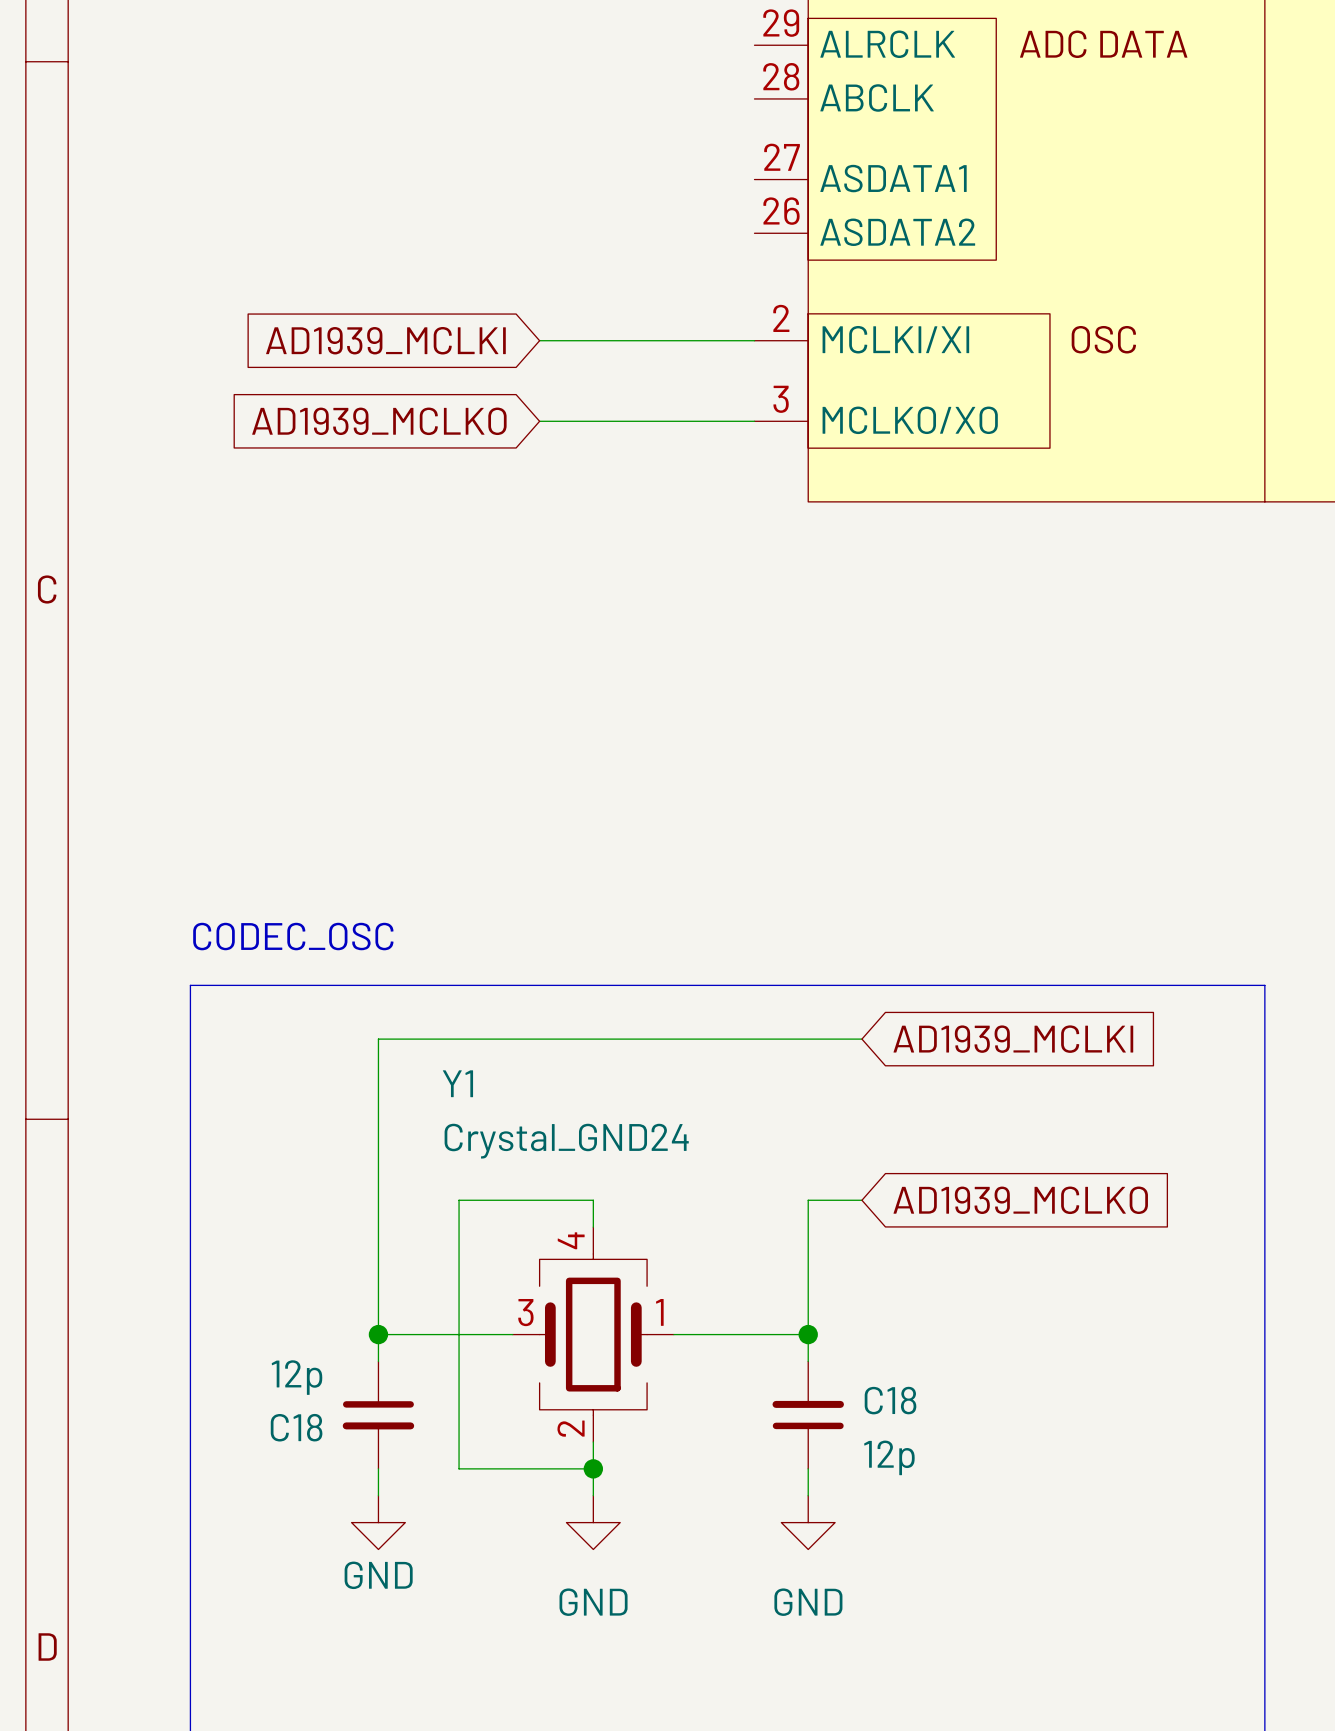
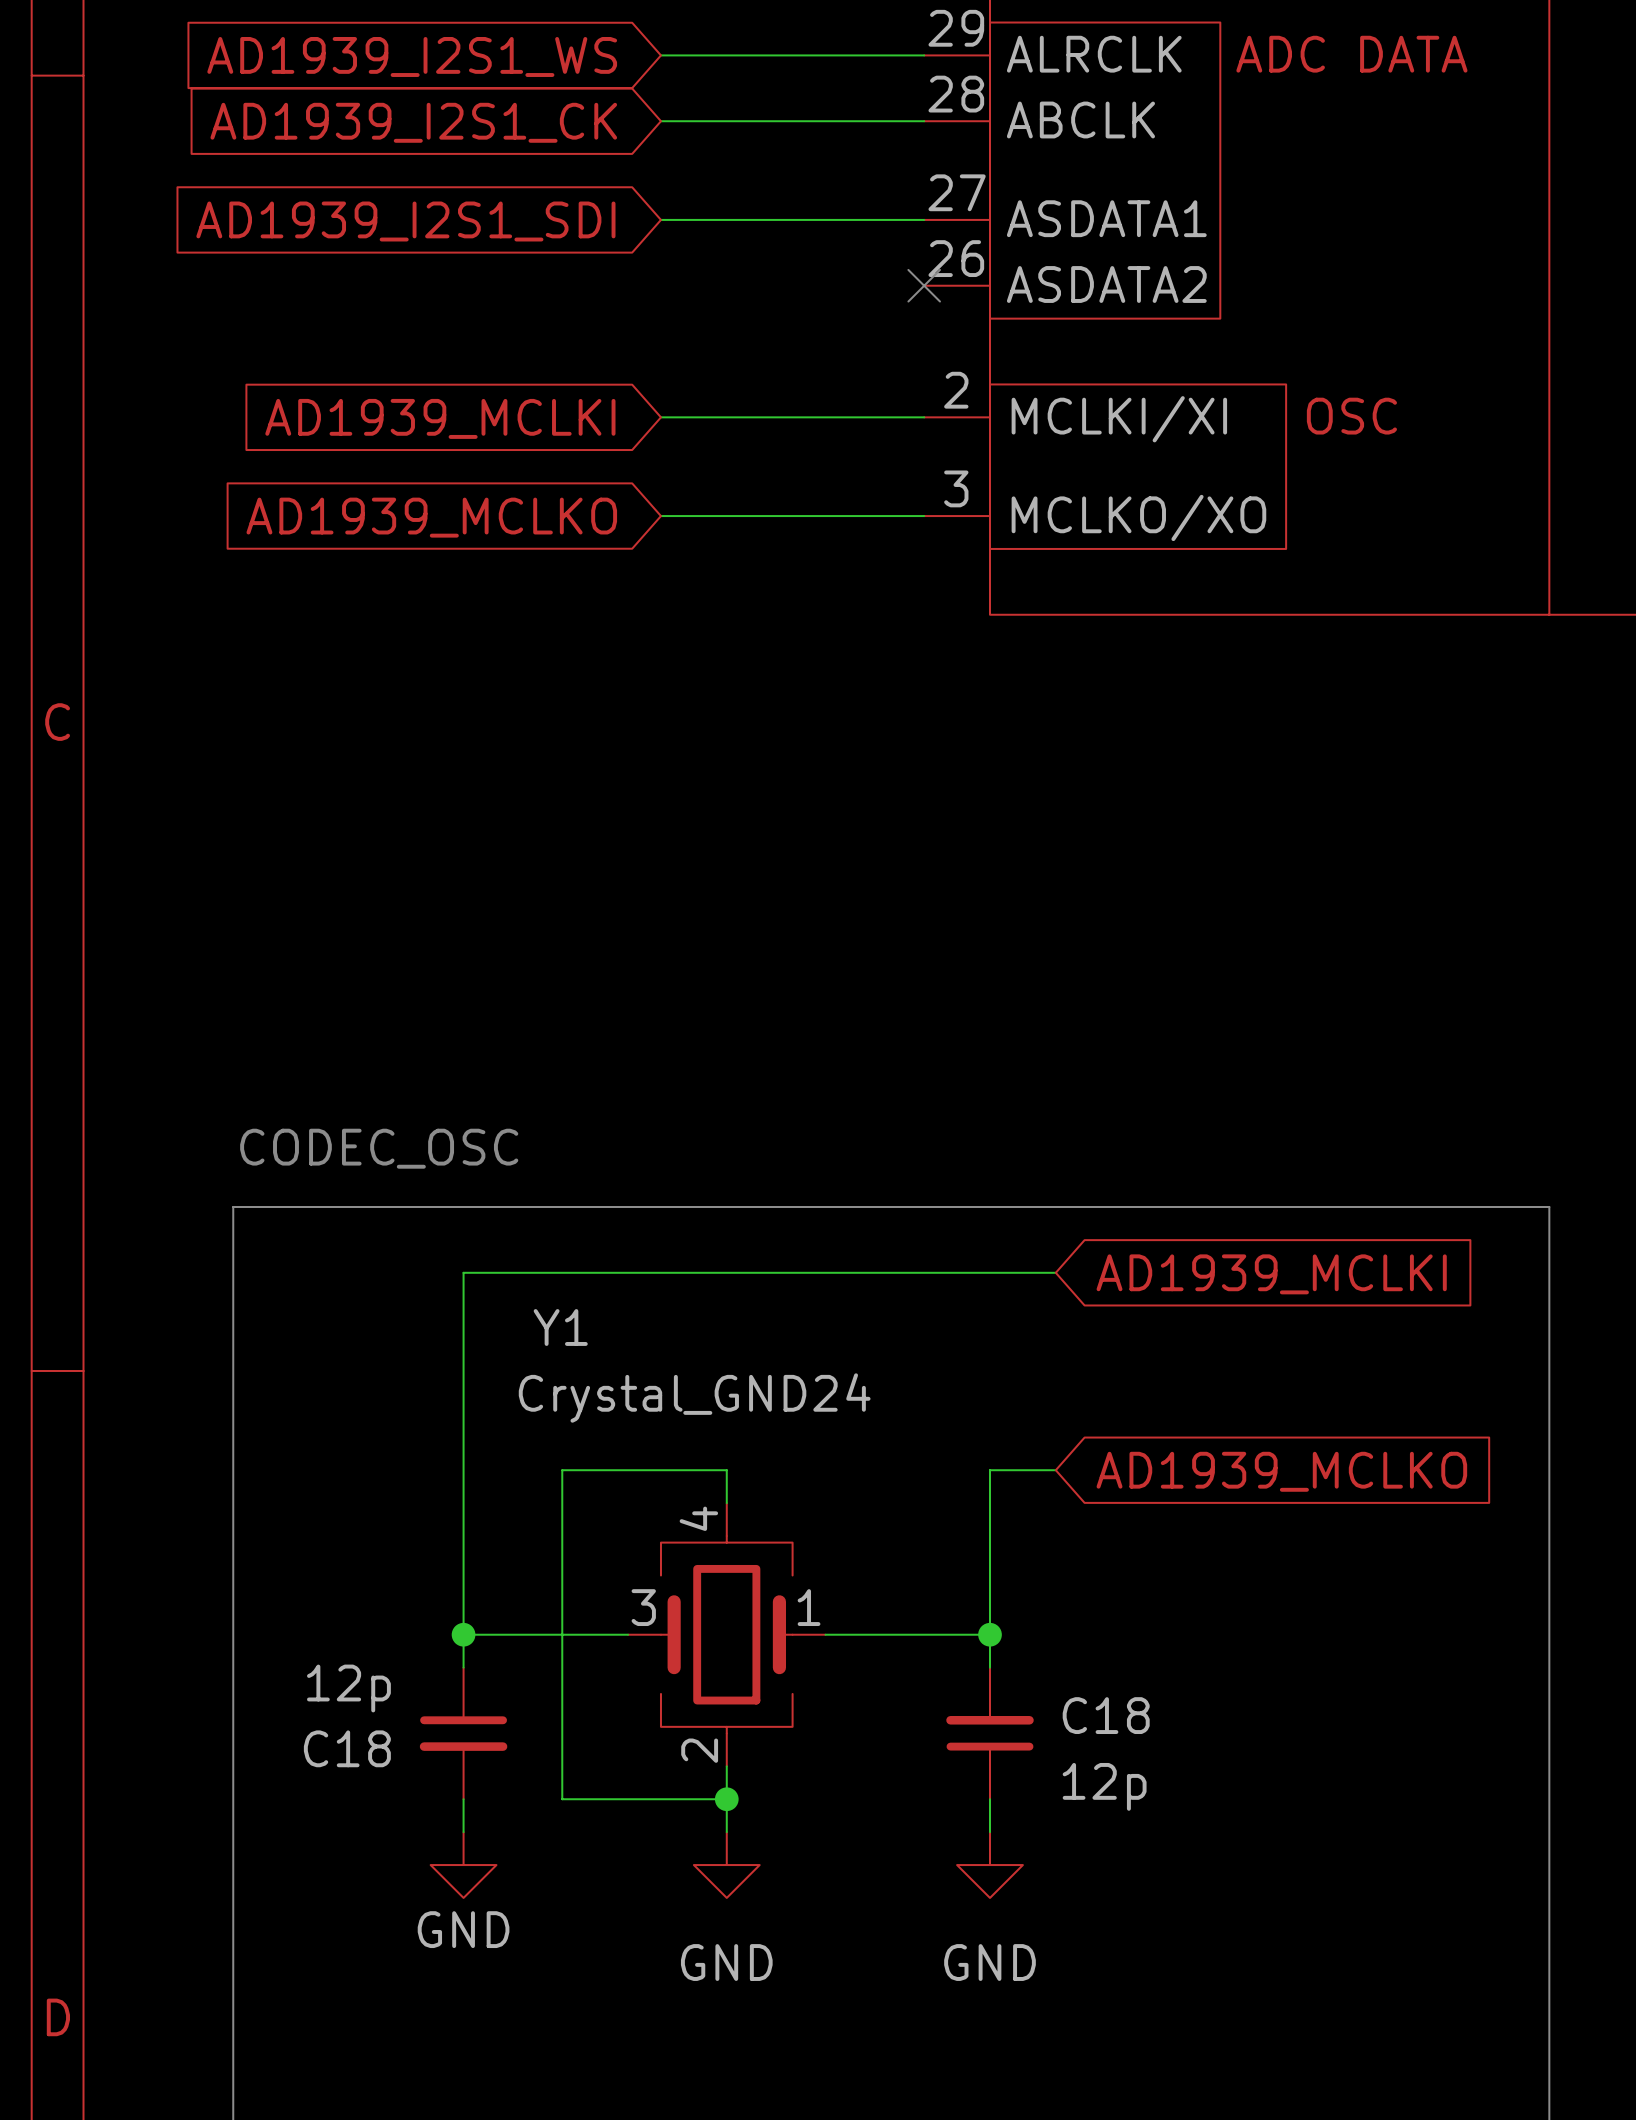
global label: none -> AD1939_I2S1_WS (412, 56)
wire: none -> (660, 55) (924, 55)
global label: none -> AD1939_I2S1_CK (413, 122)
wire: none -> (660, 121) (924, 121)
global label: none -> AD1939_I2S1_SDI (405, 221)
wire: none -> (660, 219) (924, 219)
no-connect mark: none -> (924, 285)

